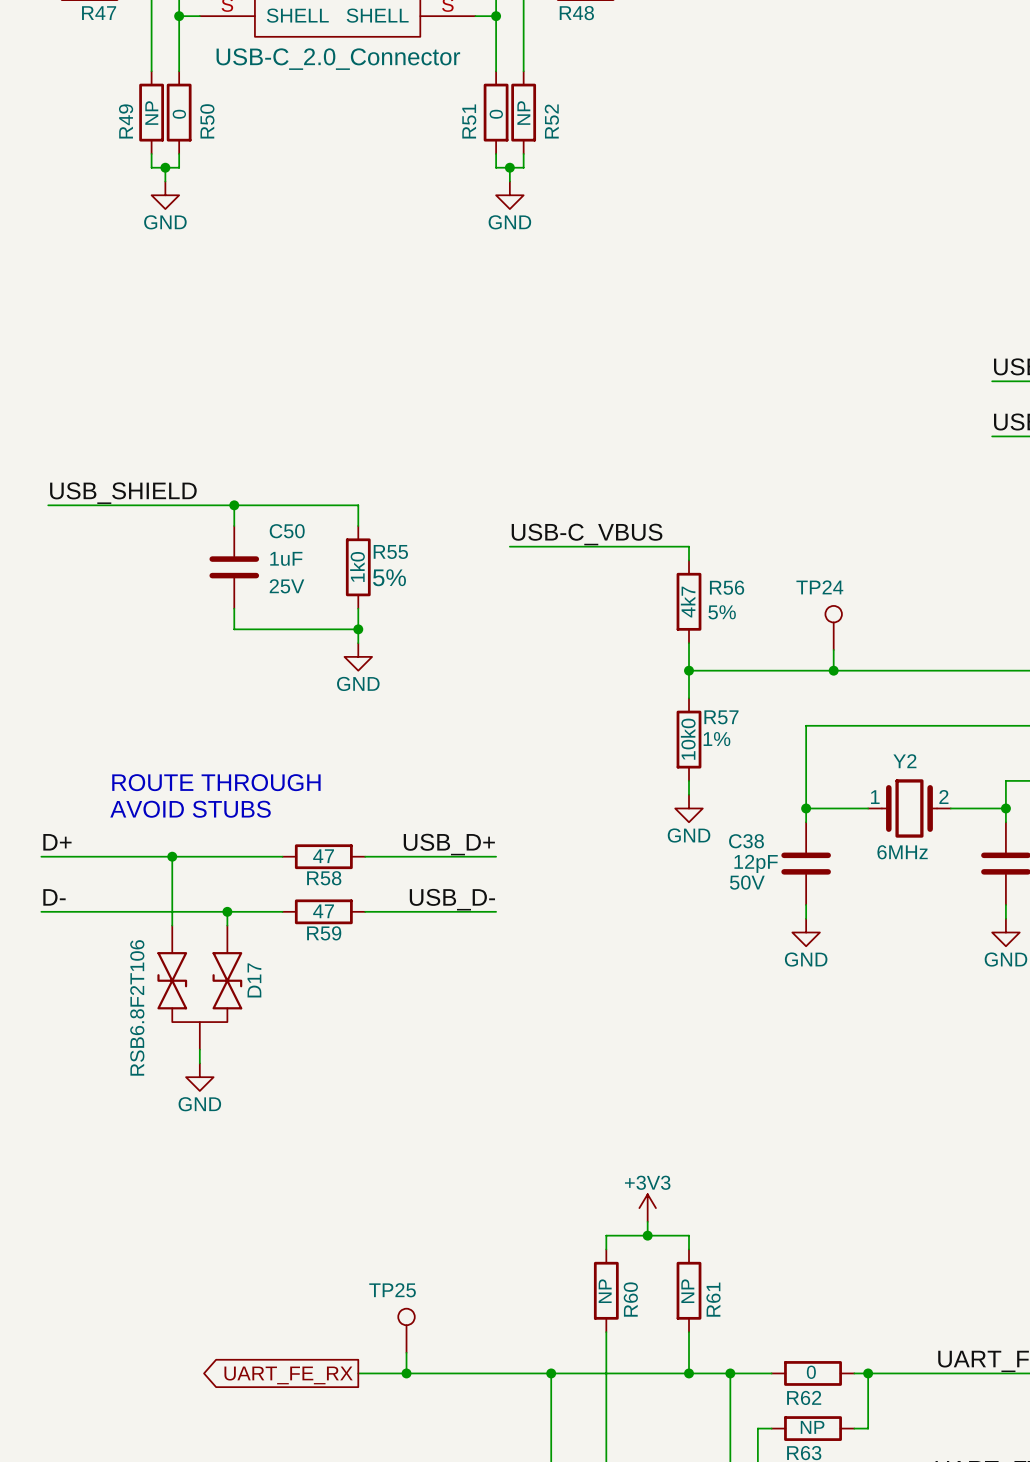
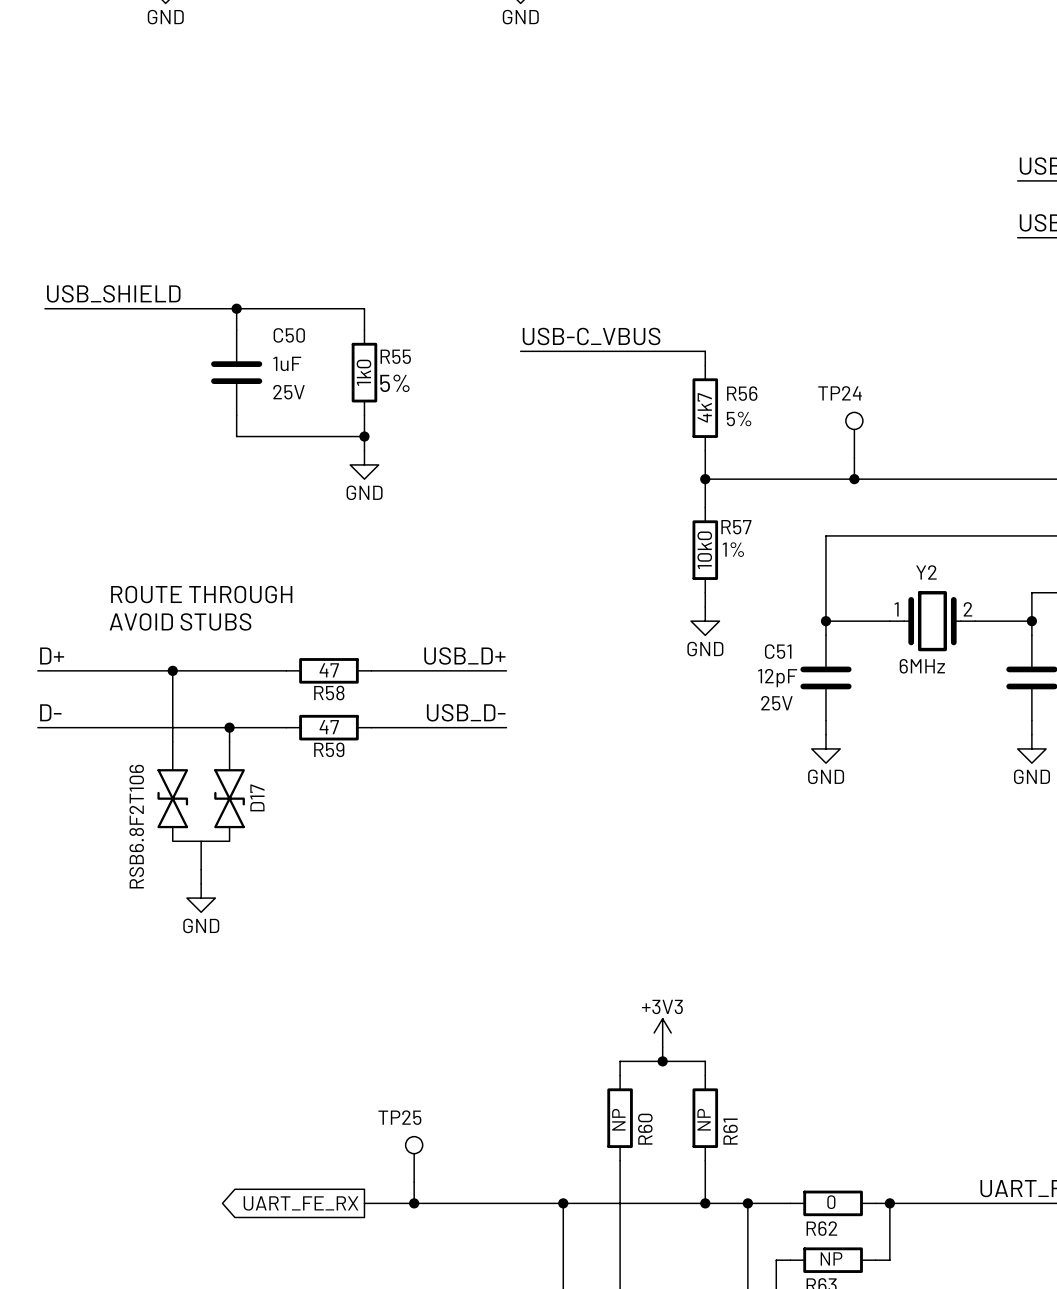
C38 name: C38 (746, 841) -> C51 (778, 651)
C38 text: 50V (747, 882) -> none
C38 text: none -> 25V (776, 703)

